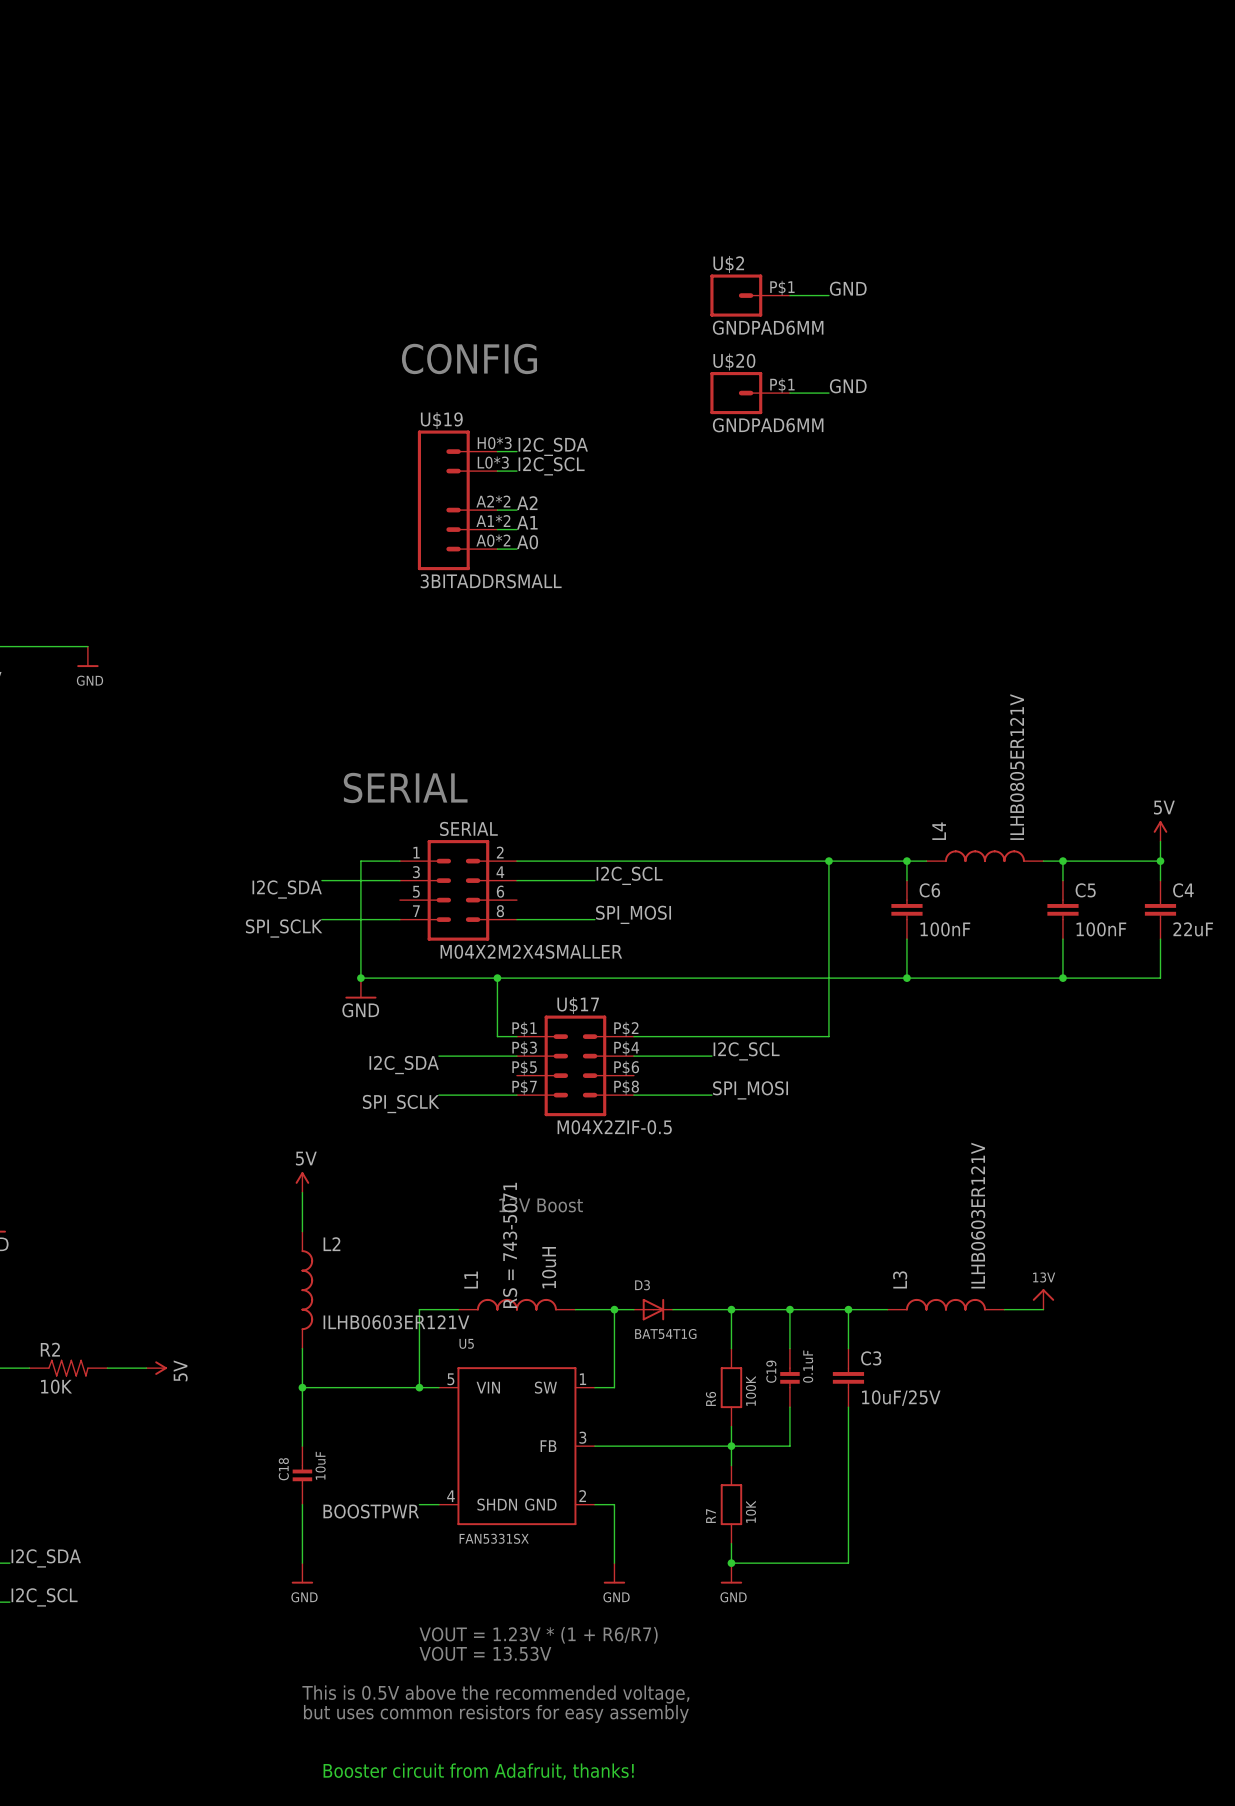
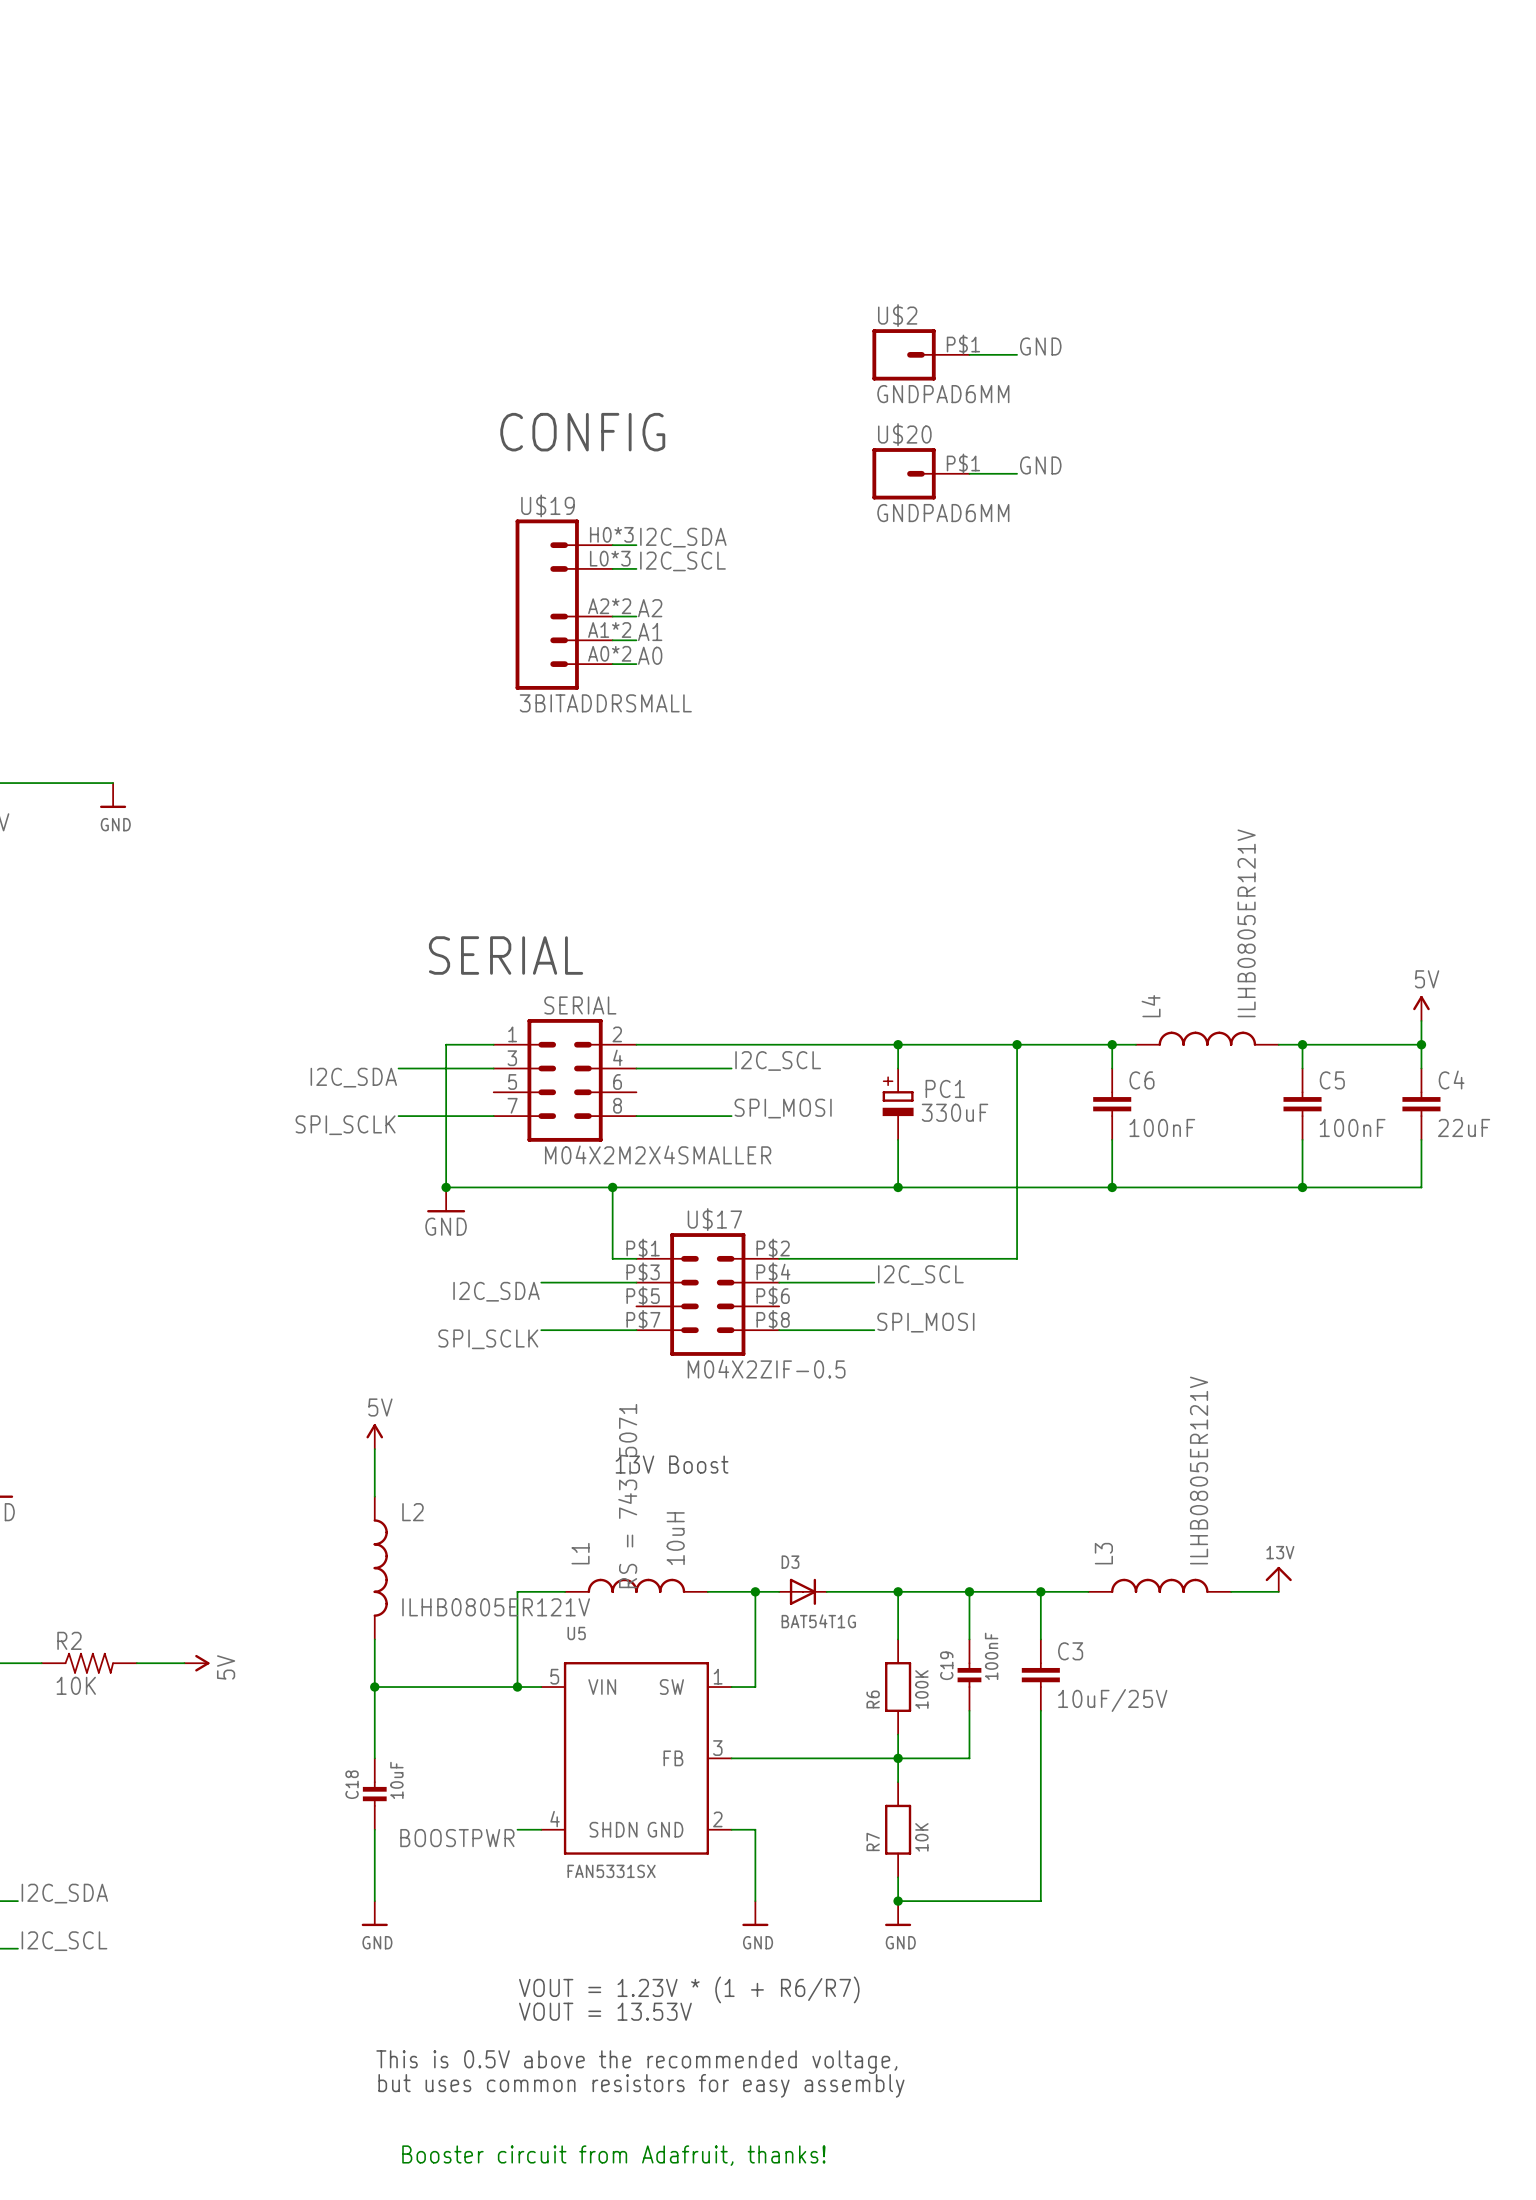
wire: none -> (898, 1044) (898, 1068)
junction: none -> (898, 1044)
PC1: none -> 330uF (898, 1104)
wire: none -> (898, 1139) (898, 1187)
junction: none -> (898, 1187)
L3 value: ILHB0603ER121V (978, 1215) -> ILHB0805ER121V (1199, 1470)
L2 value: ILHB0603ER121V (396, 1322) -> ILHB0805ER121V (496, 1607)
C19 value: 0.1uF (808, 1366) -> 100nF (991, 1656)

